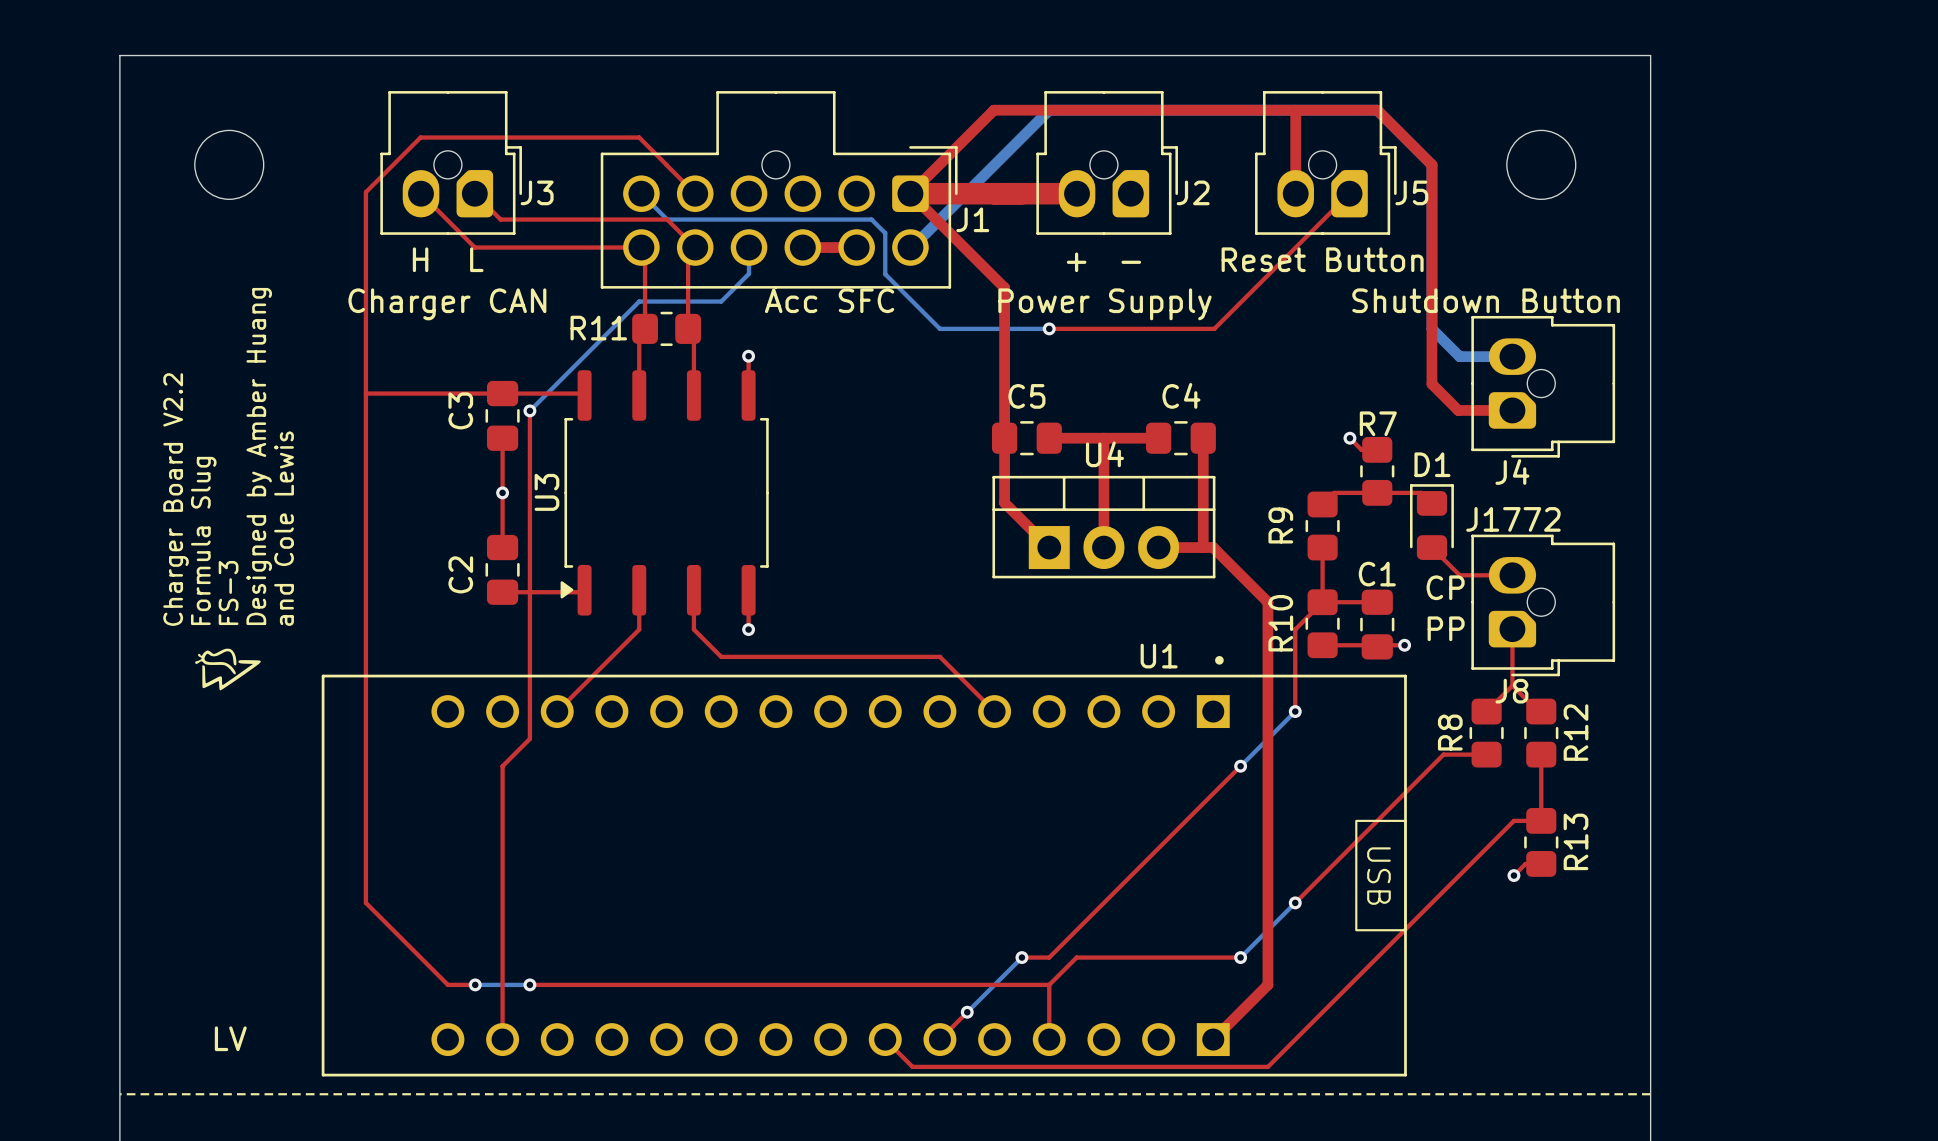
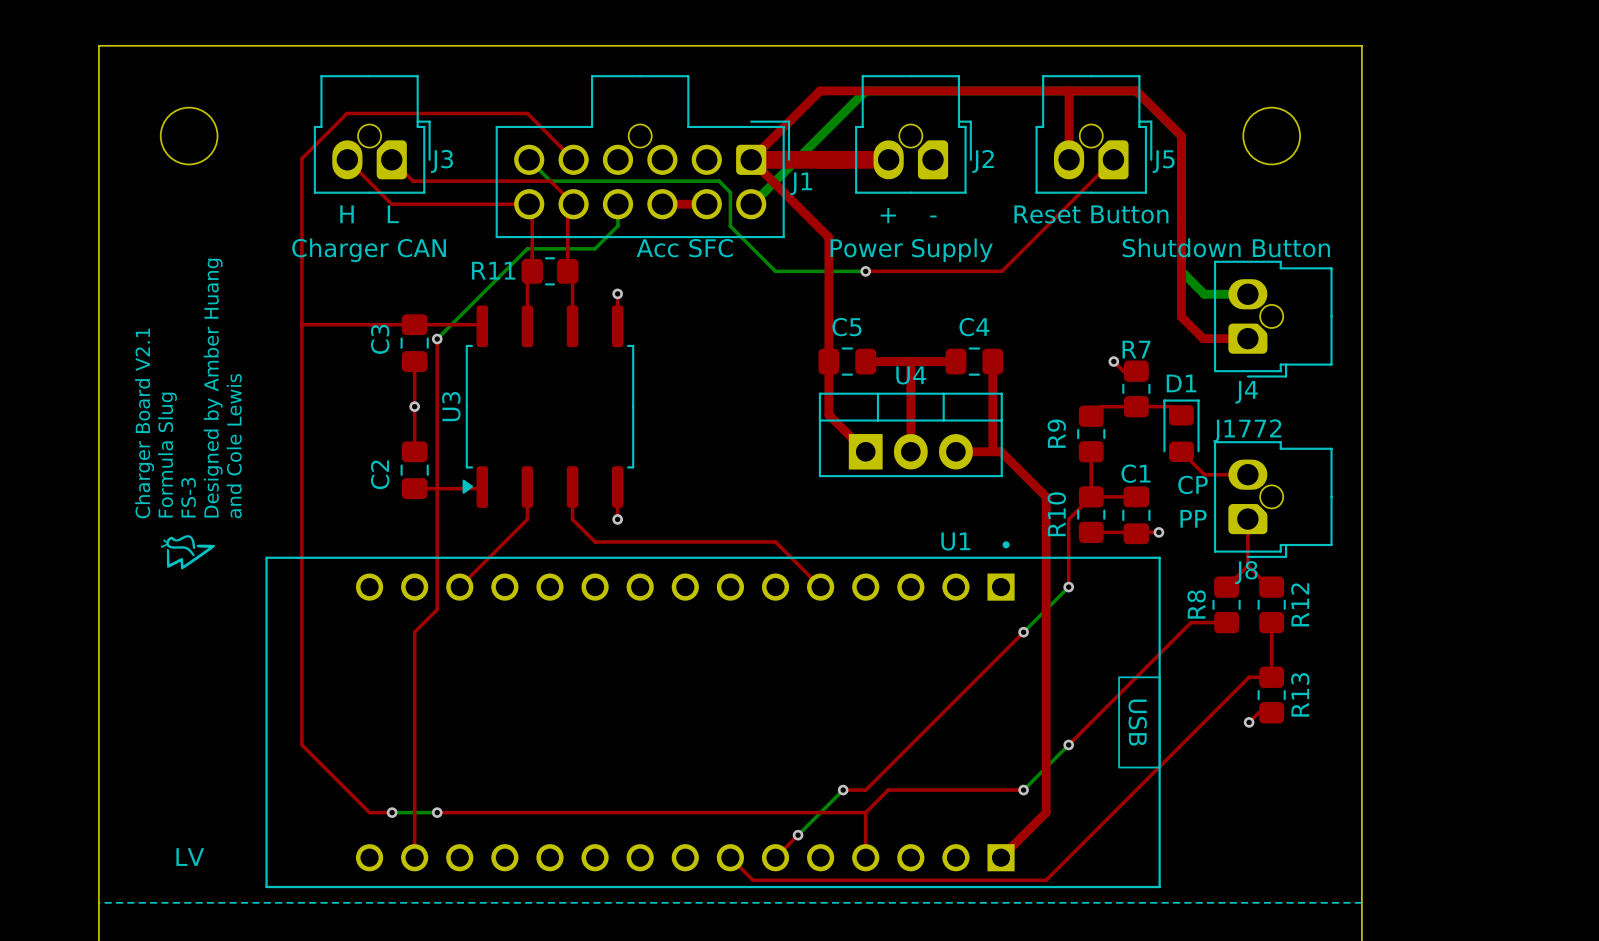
text: Charger Board V2.2 (176, 499) -> Charger Board V2.1 (144, 423)

